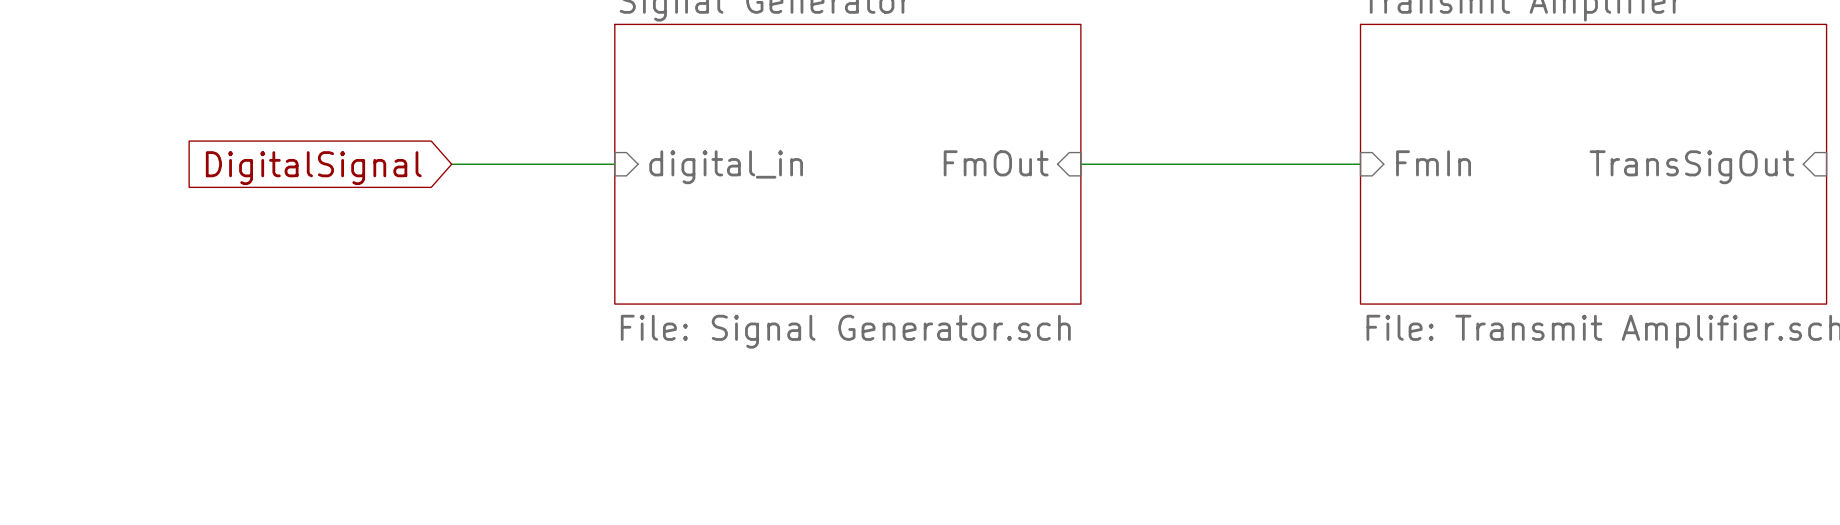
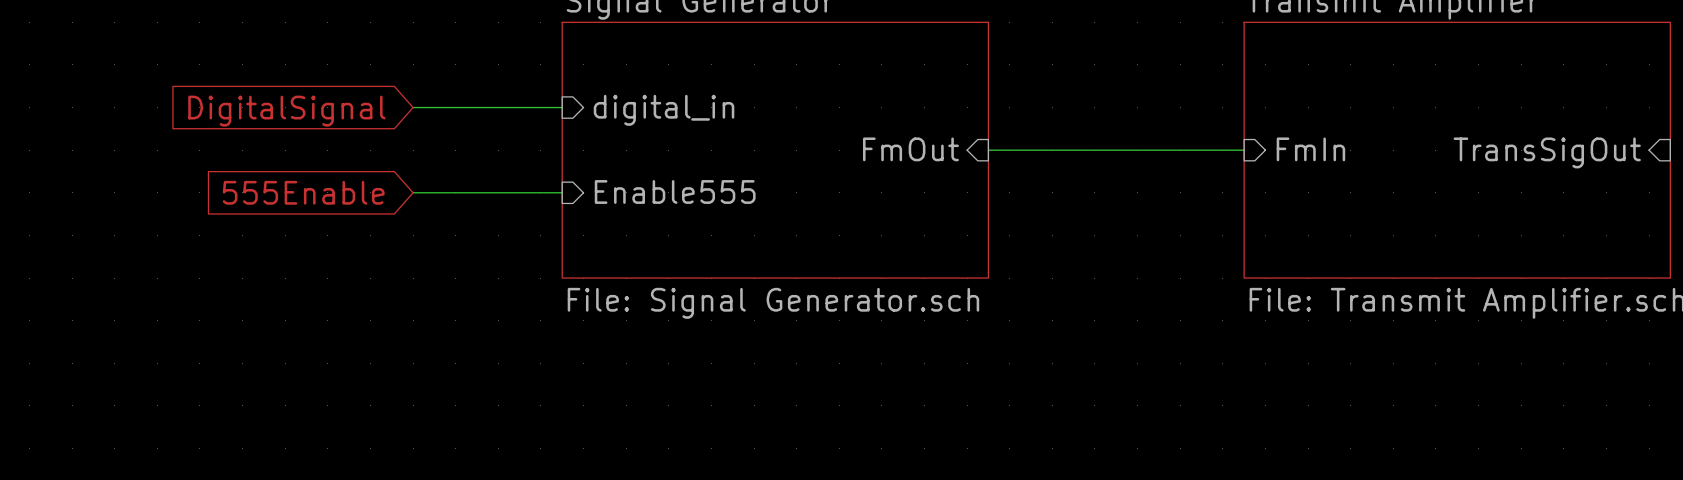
wire: (451, 164) (614, 164) -> (413, 107) (562, 107)
sheet pin position: digital_in (726, 167) -> digital_in (664, 110)
global label position: DigitalSignal (313, 168) -> DigitalSignal (286, 111)
sheet pin: none -> Enable555 (675, 192)
global label: none -> 555Enable (303, 192)
wire: none -> (413, 192) (562, 192)

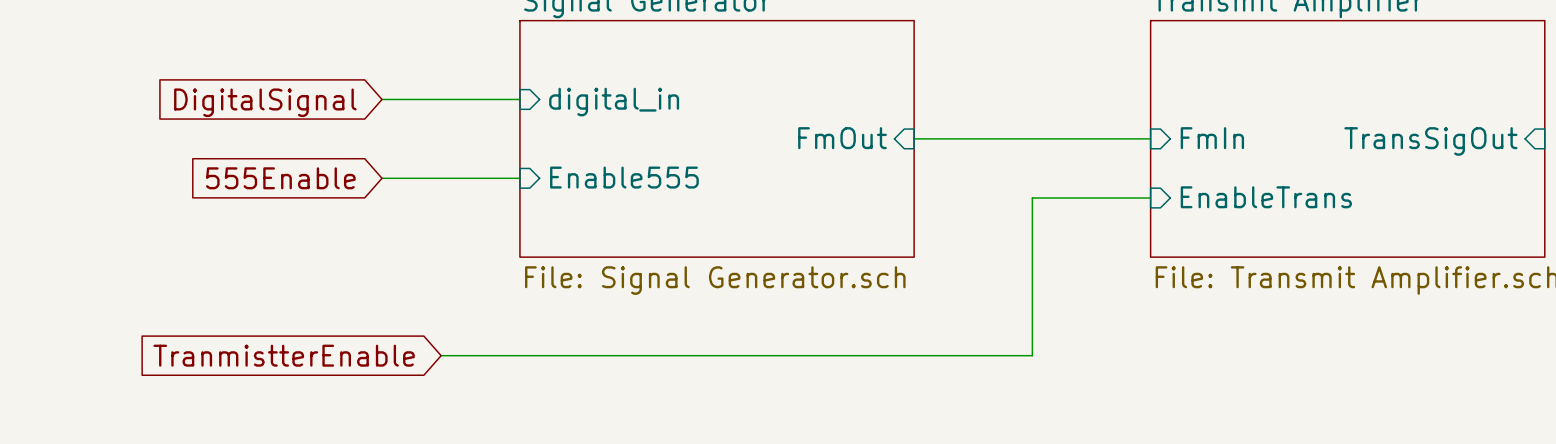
sheet pin: none -> EnableTrans (1266, 197)
wire: none -> (1150, 198) (1032, 198) (1032, 355) (441, 355)
global label: none -> TranmistterEnable (284, 355)

